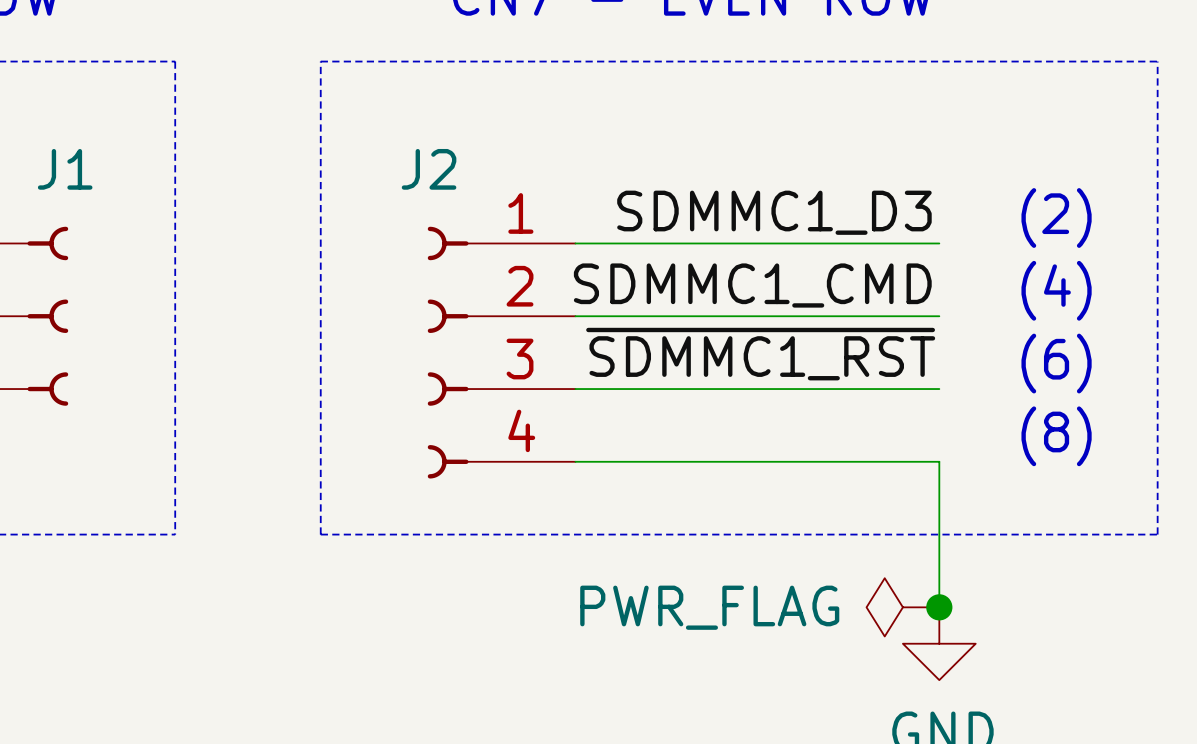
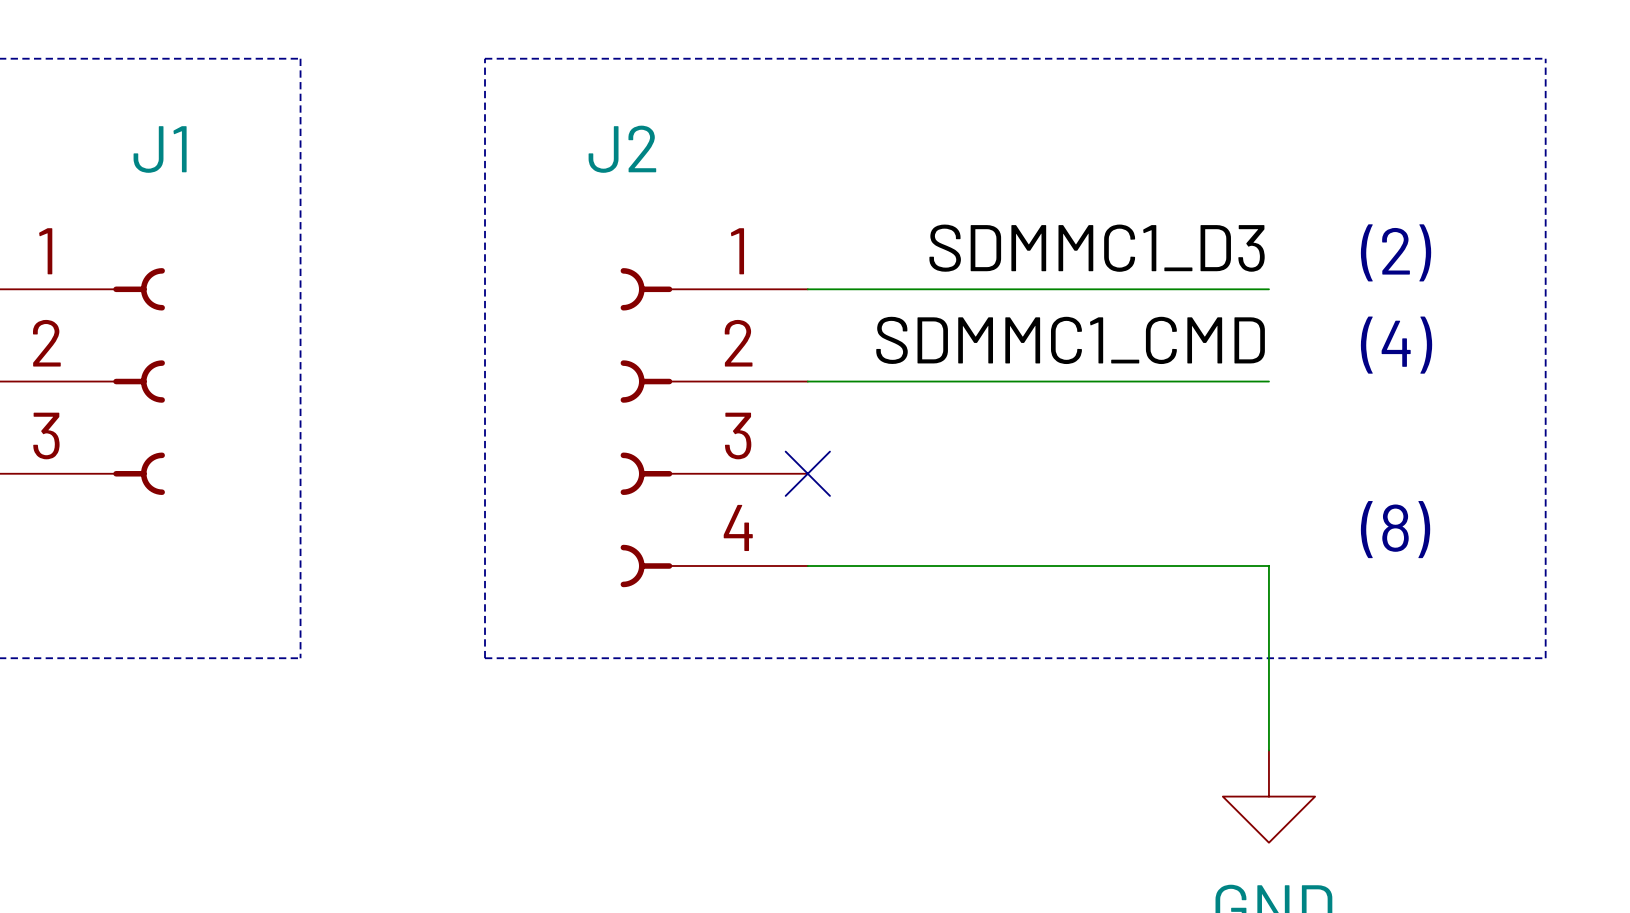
J1 name position: J1 (65, 169) -> J1 (160, 149)
J2 name position: J2 (429, 169) -> J2 (622, 149)
label: ~{SDMMC1_RST} (760, 354) -> none
text: (6) (1056, 363) -> none
wire: (575, 389) (939, 389) -> none
no-connect mark: none -> (807, 473)
power symbol: PWR_FLAG (902, 607) -> none
junction: (939, 607) -> none

